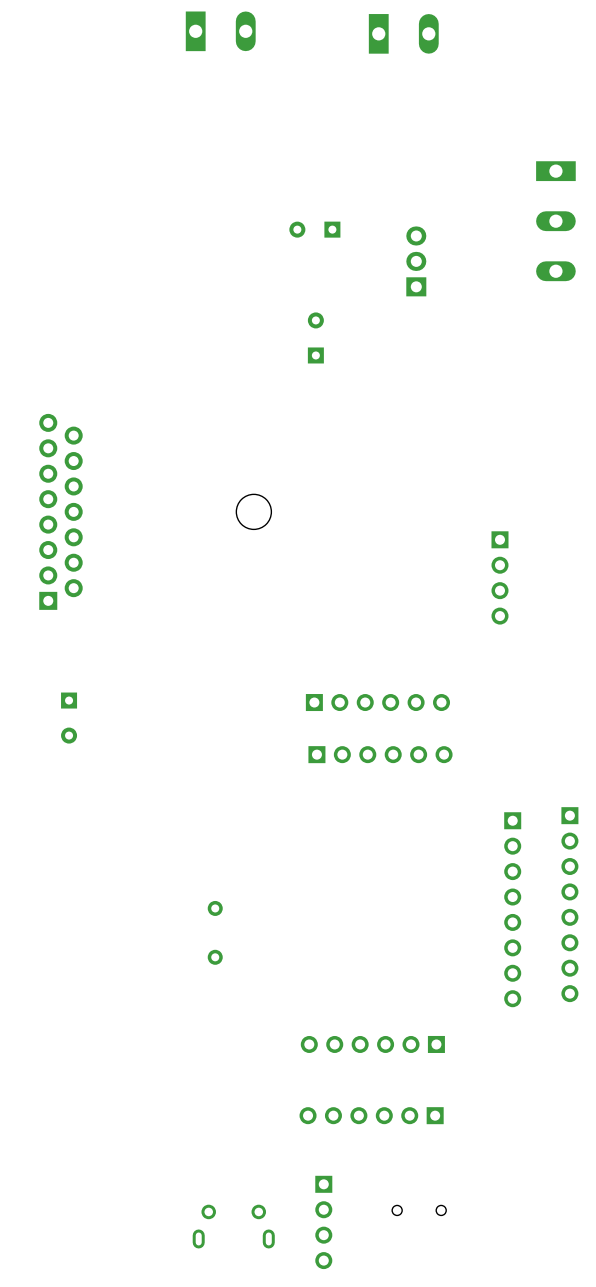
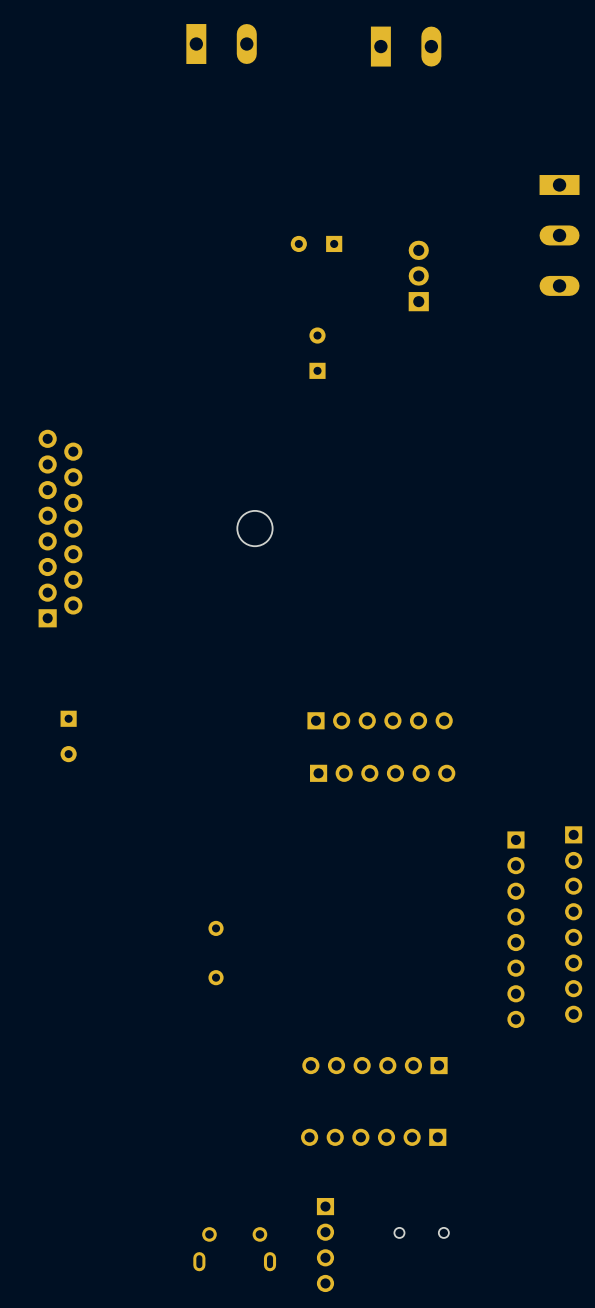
part: (499, 577) -> none

